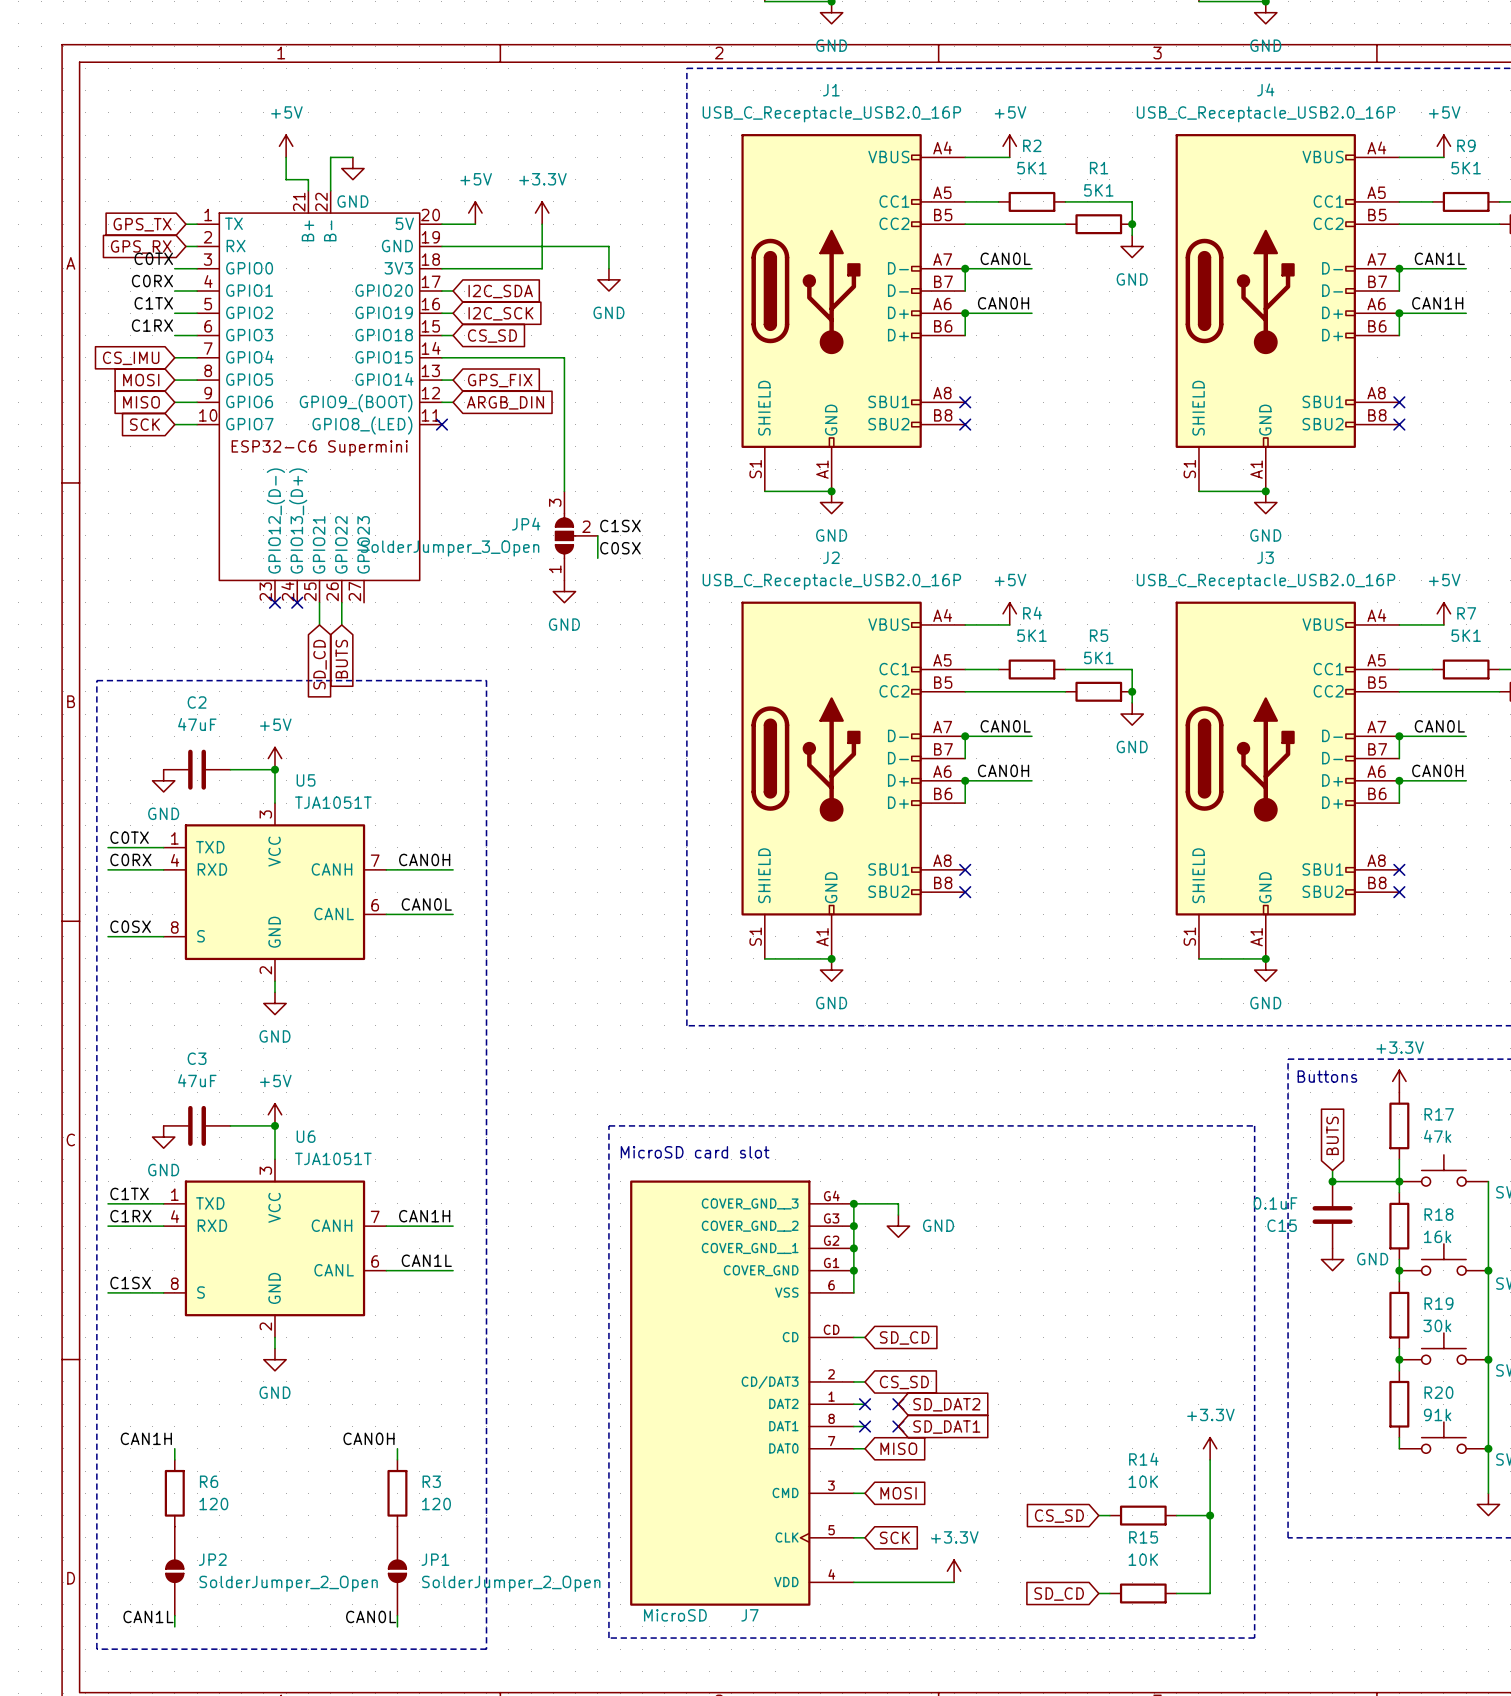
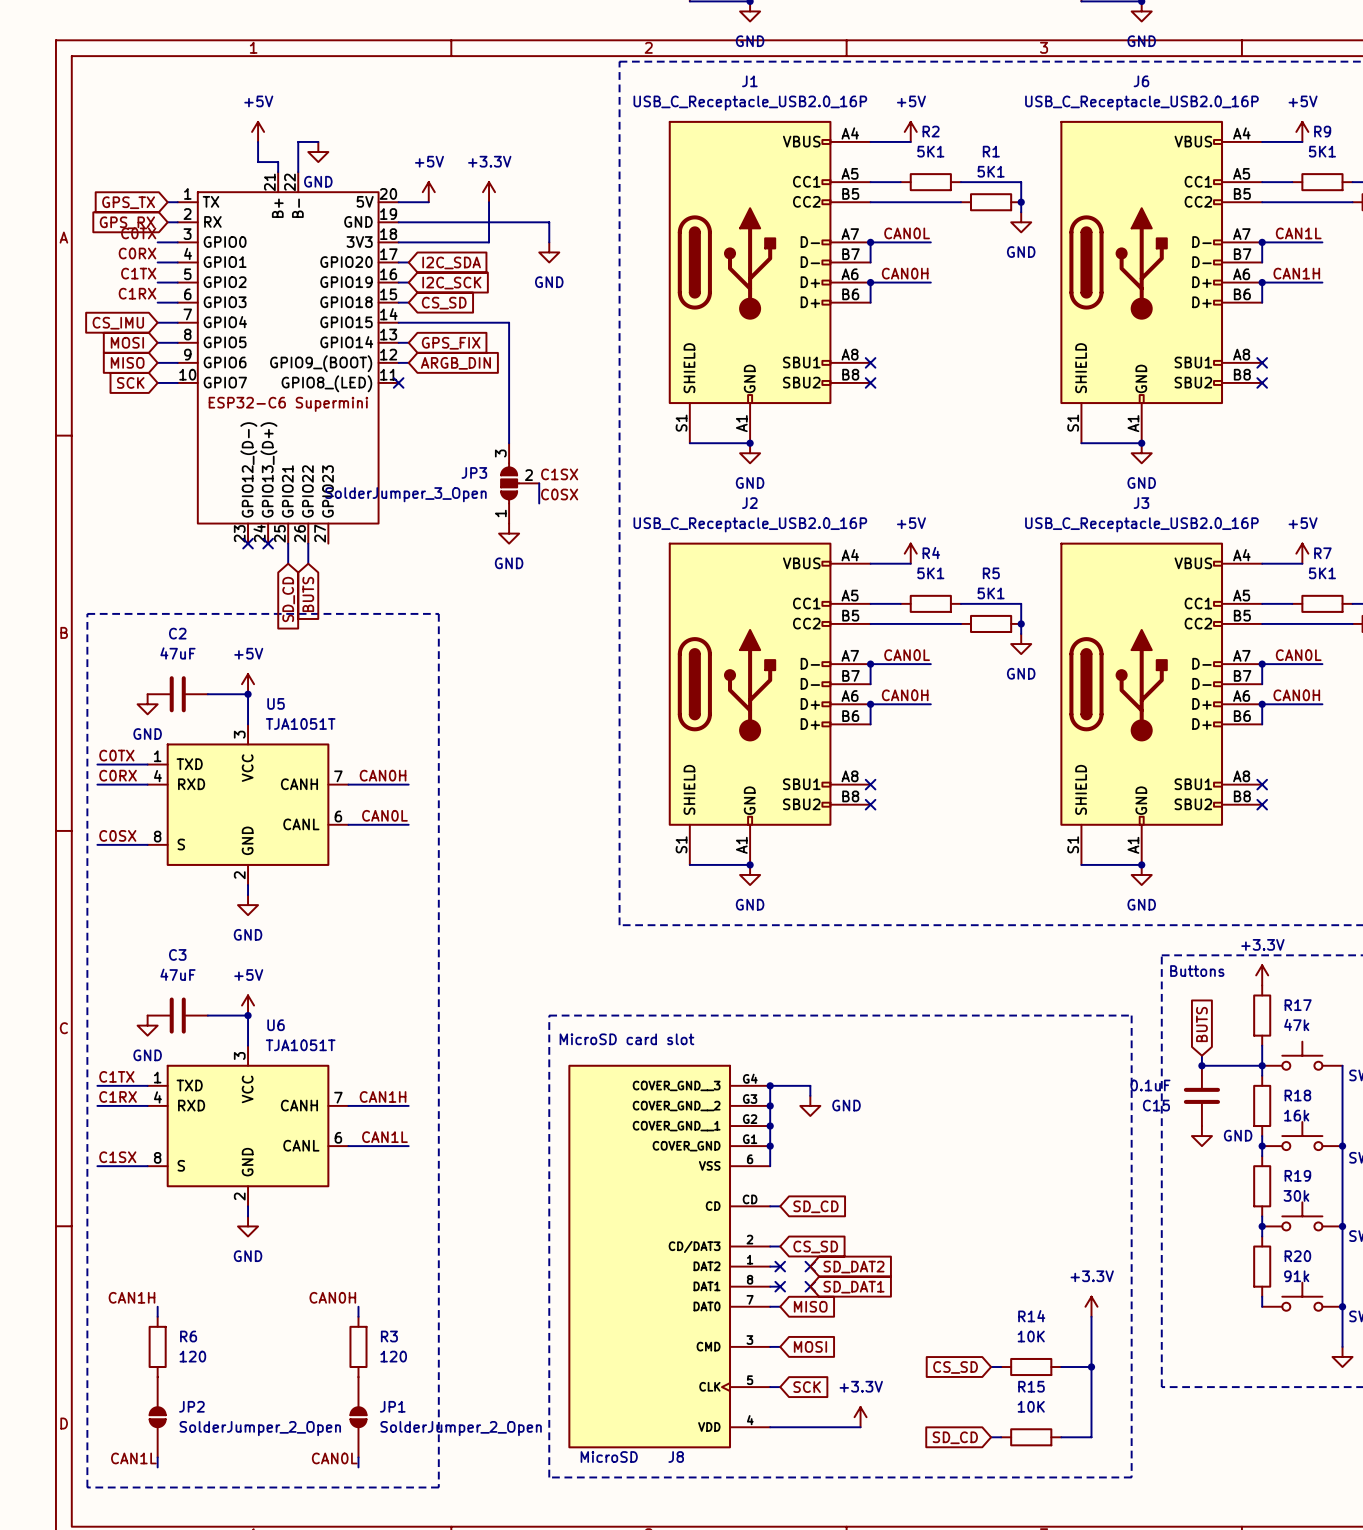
J4 name: J4 (1265, 89) -> J6 (1141, 81)
JP4 name: JP4 (526, 524) -> JP3 (474, 472)
J7 name: J7 (749, 1615) -> J8 (676, 1457)

